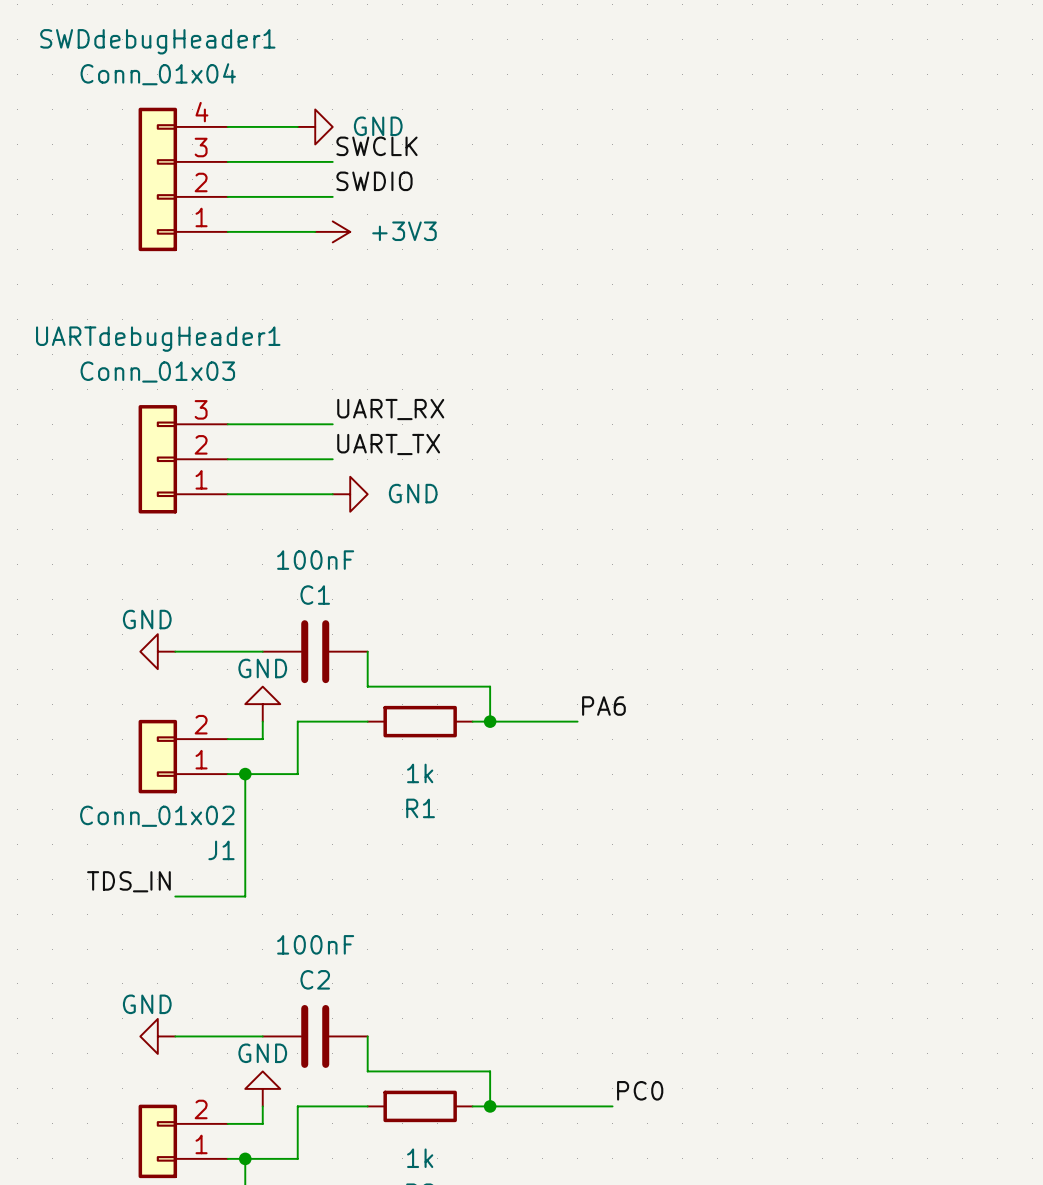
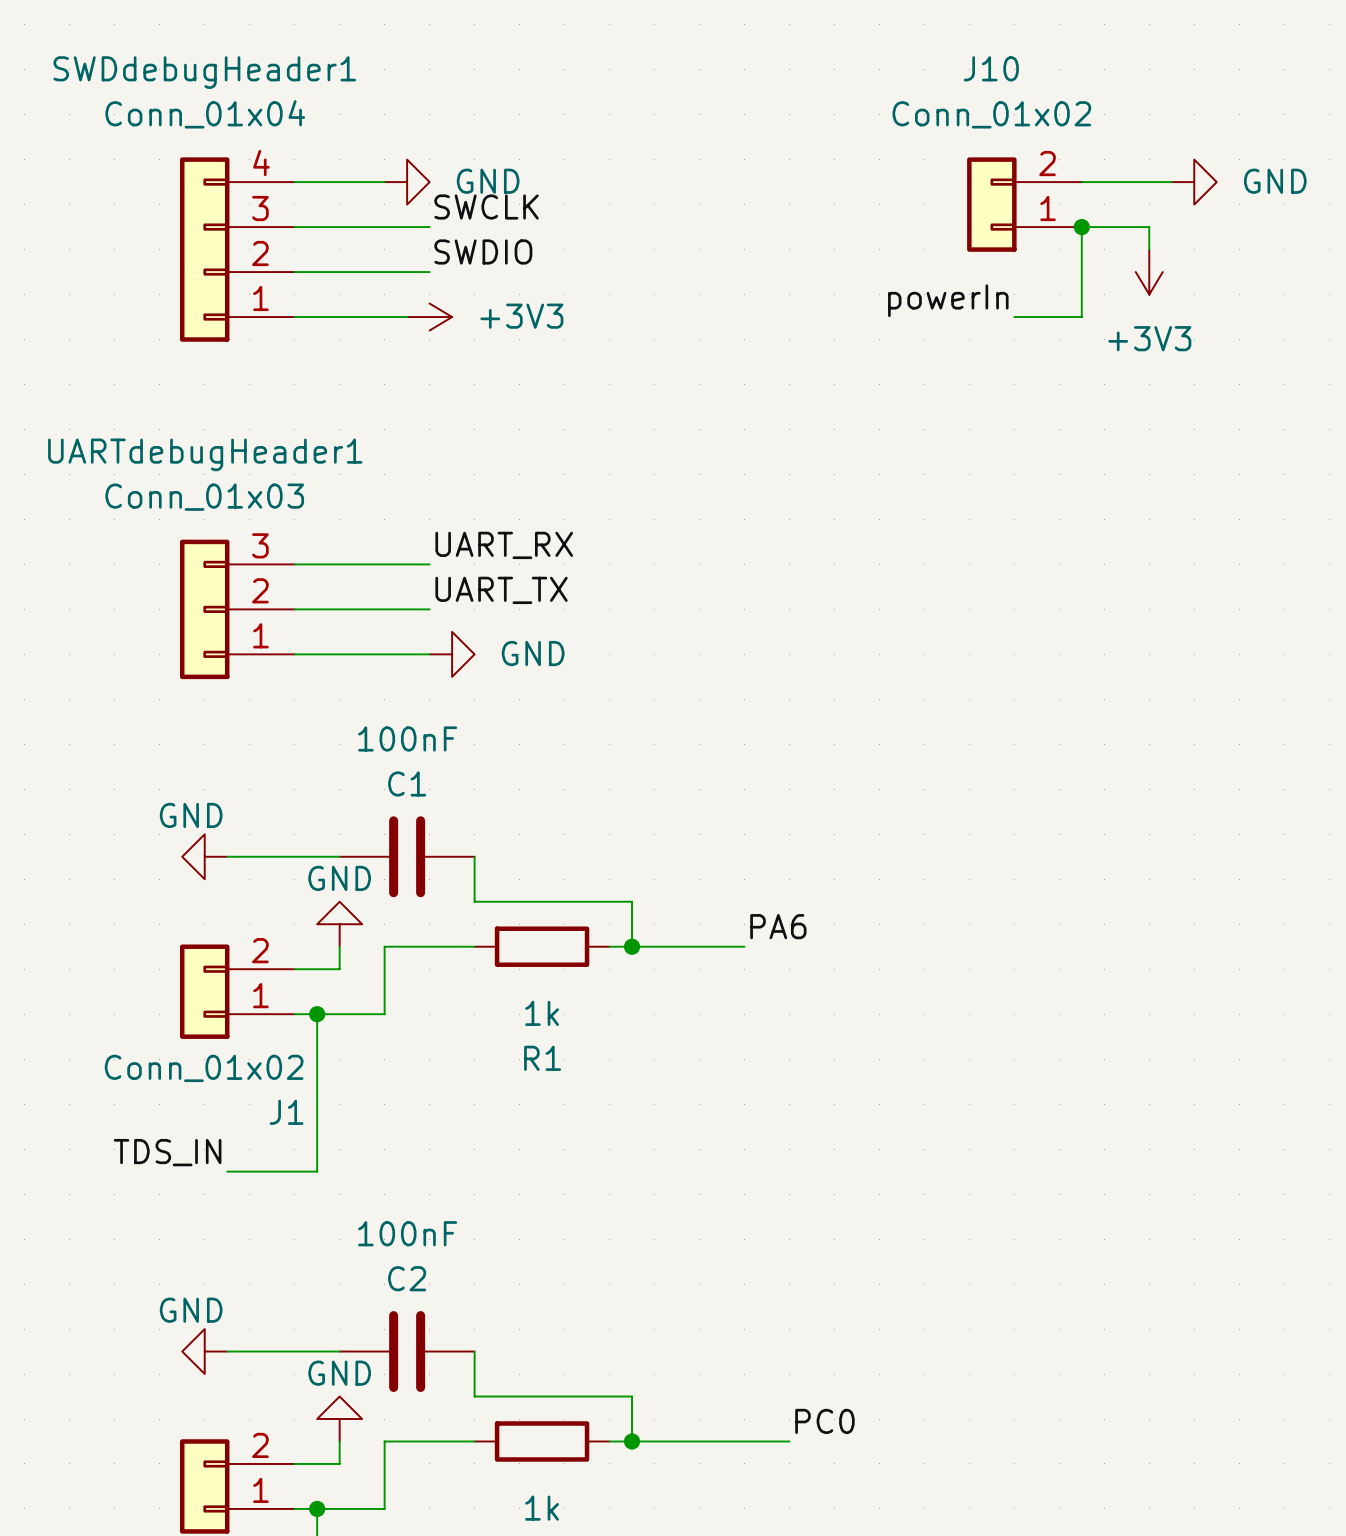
wire: none -> (1081, 182) (1171, 182)
power symbol: none -> GND (1194, 182)
J10: none -> Conn_01x02 (1024, 204)
junction: none -> (1081, 227)
wire: none -> (1149, 249) (1149, 227) (1081, 227) (1081, 317) (1014, 317)
power symbol: none -> +3V3 (1149, 272)
label: none -> powerIn (948, 300)

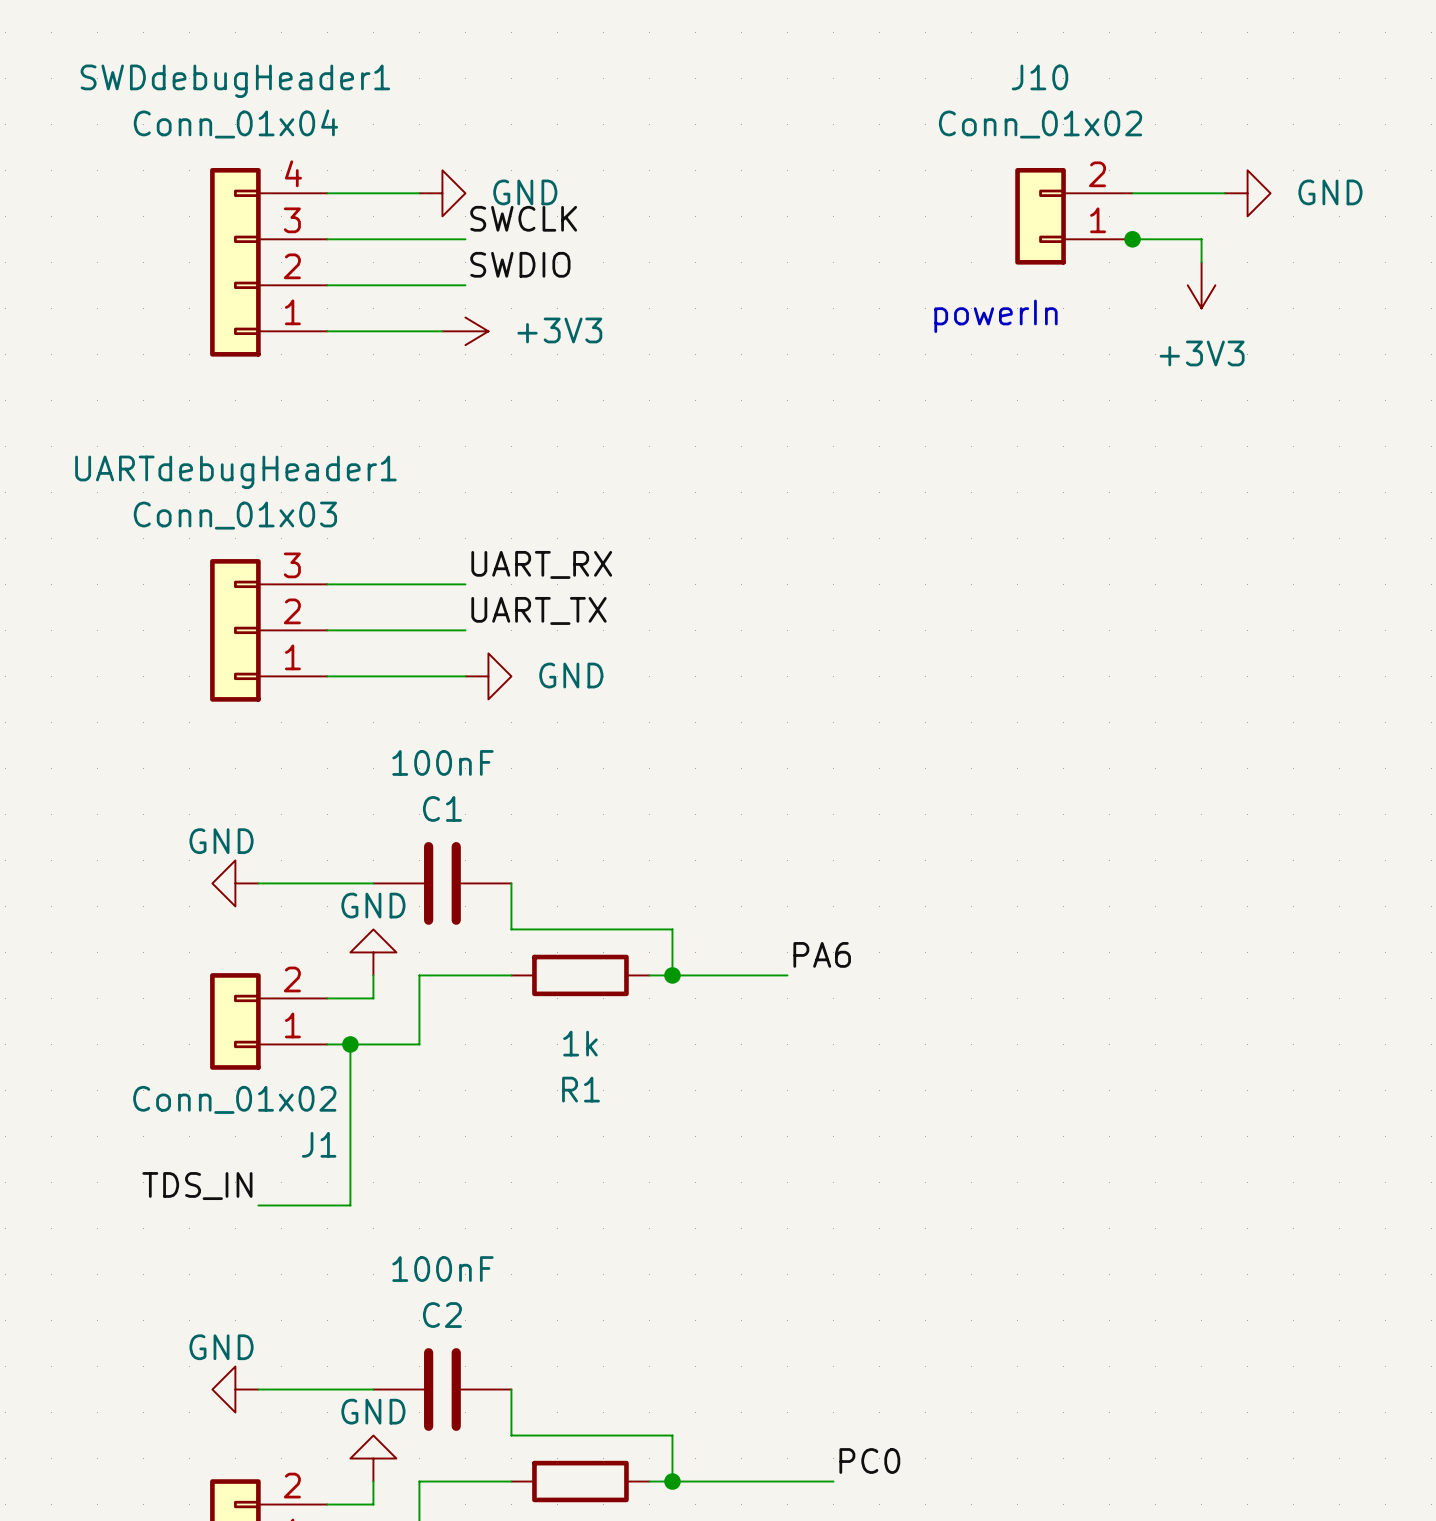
wire: (1081, 227) (1081, 317) (1014, 317) -> none
label: powerIn (948, 300) -> none
text: none -> powerIn (996, 316)

